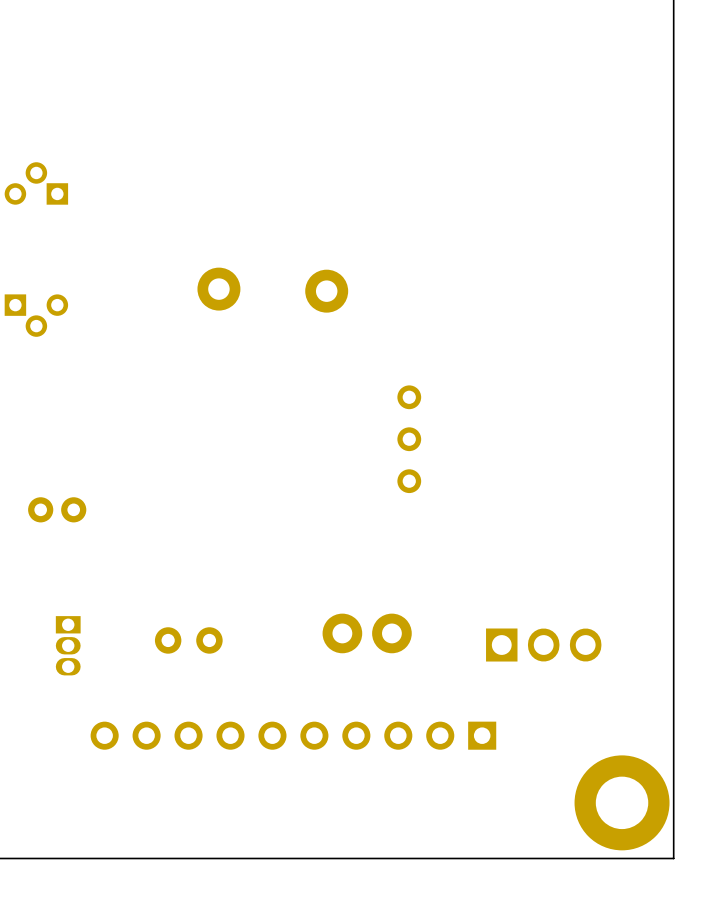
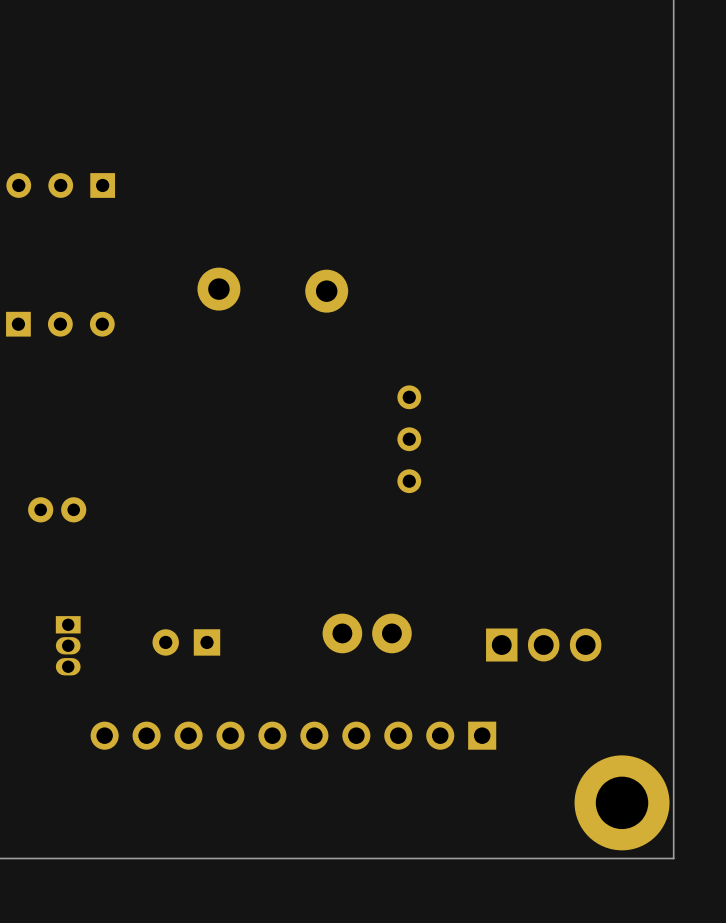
part: (36, 183) -> none
part: none -> (60, 185)
part: (36, 315) -> none
part: none -> (60, 324)
part footprint: [154, 627, 223, 654] -> [152, 629, 221, 656]

